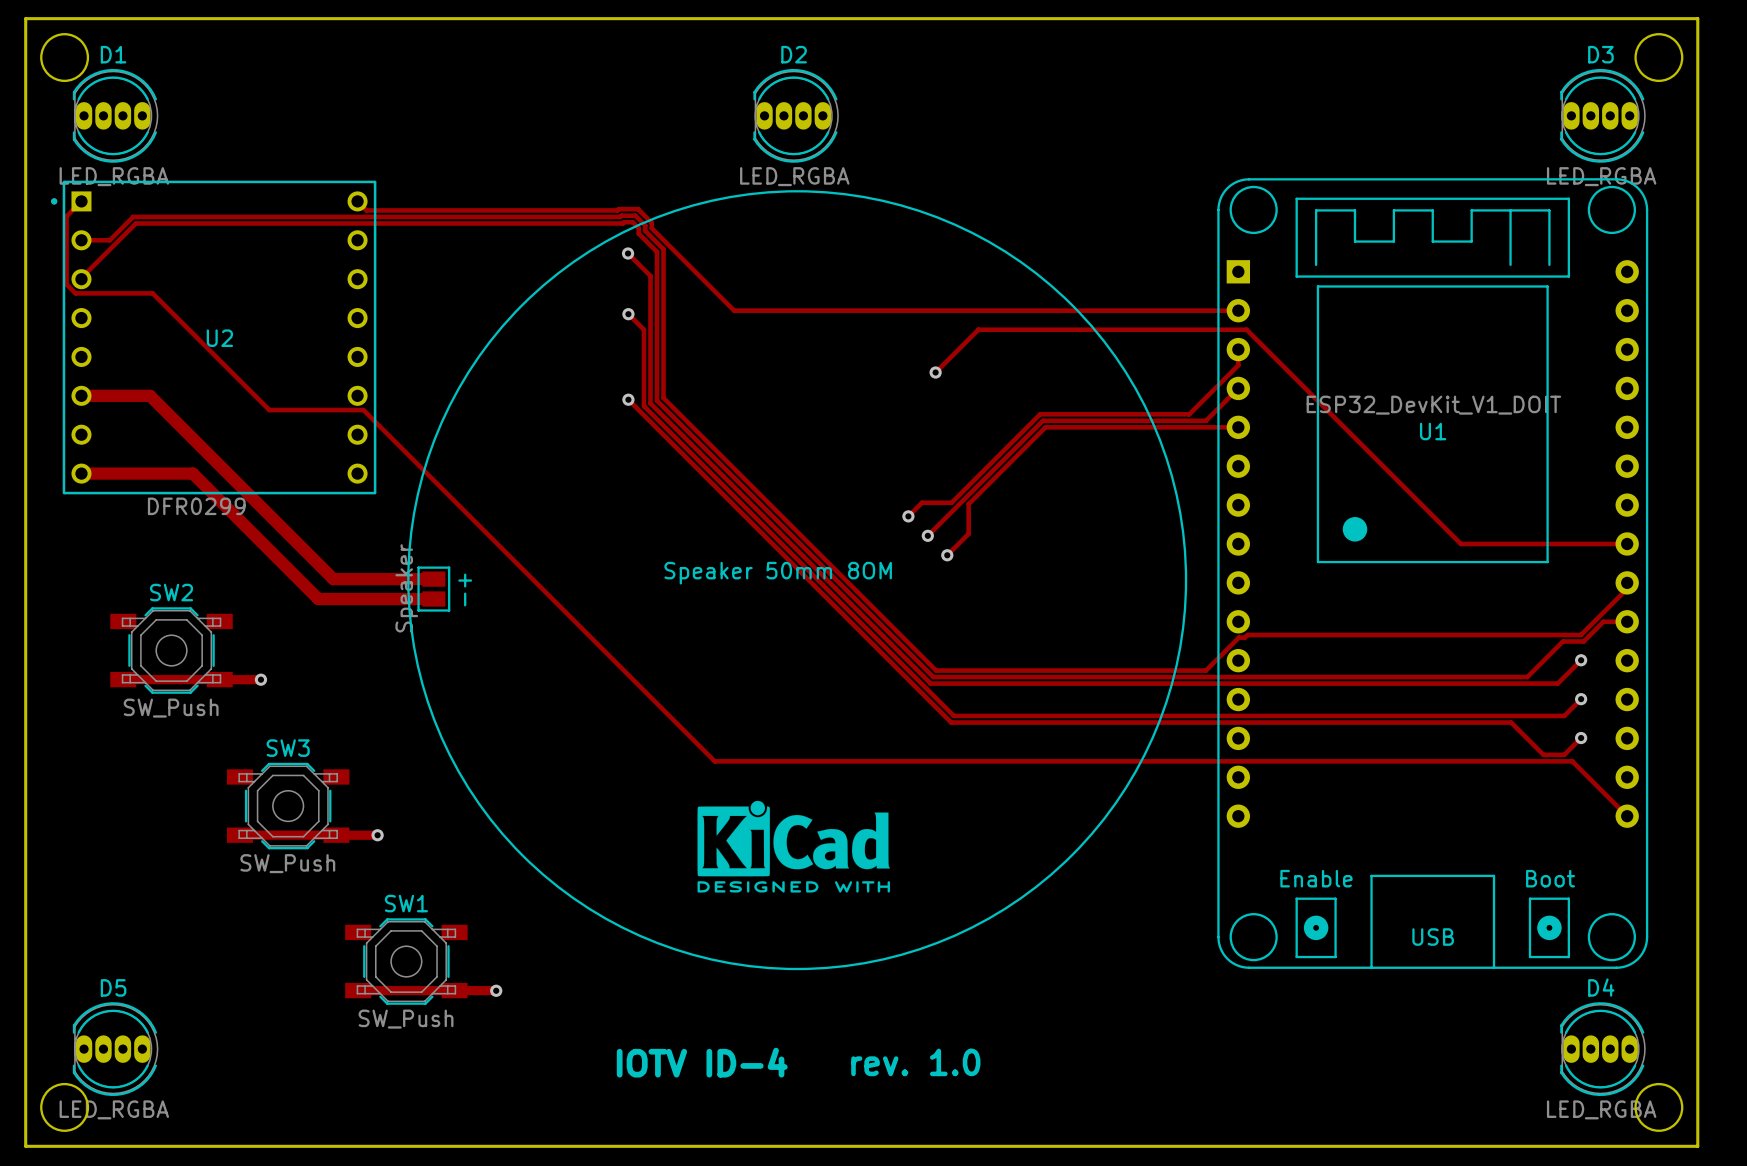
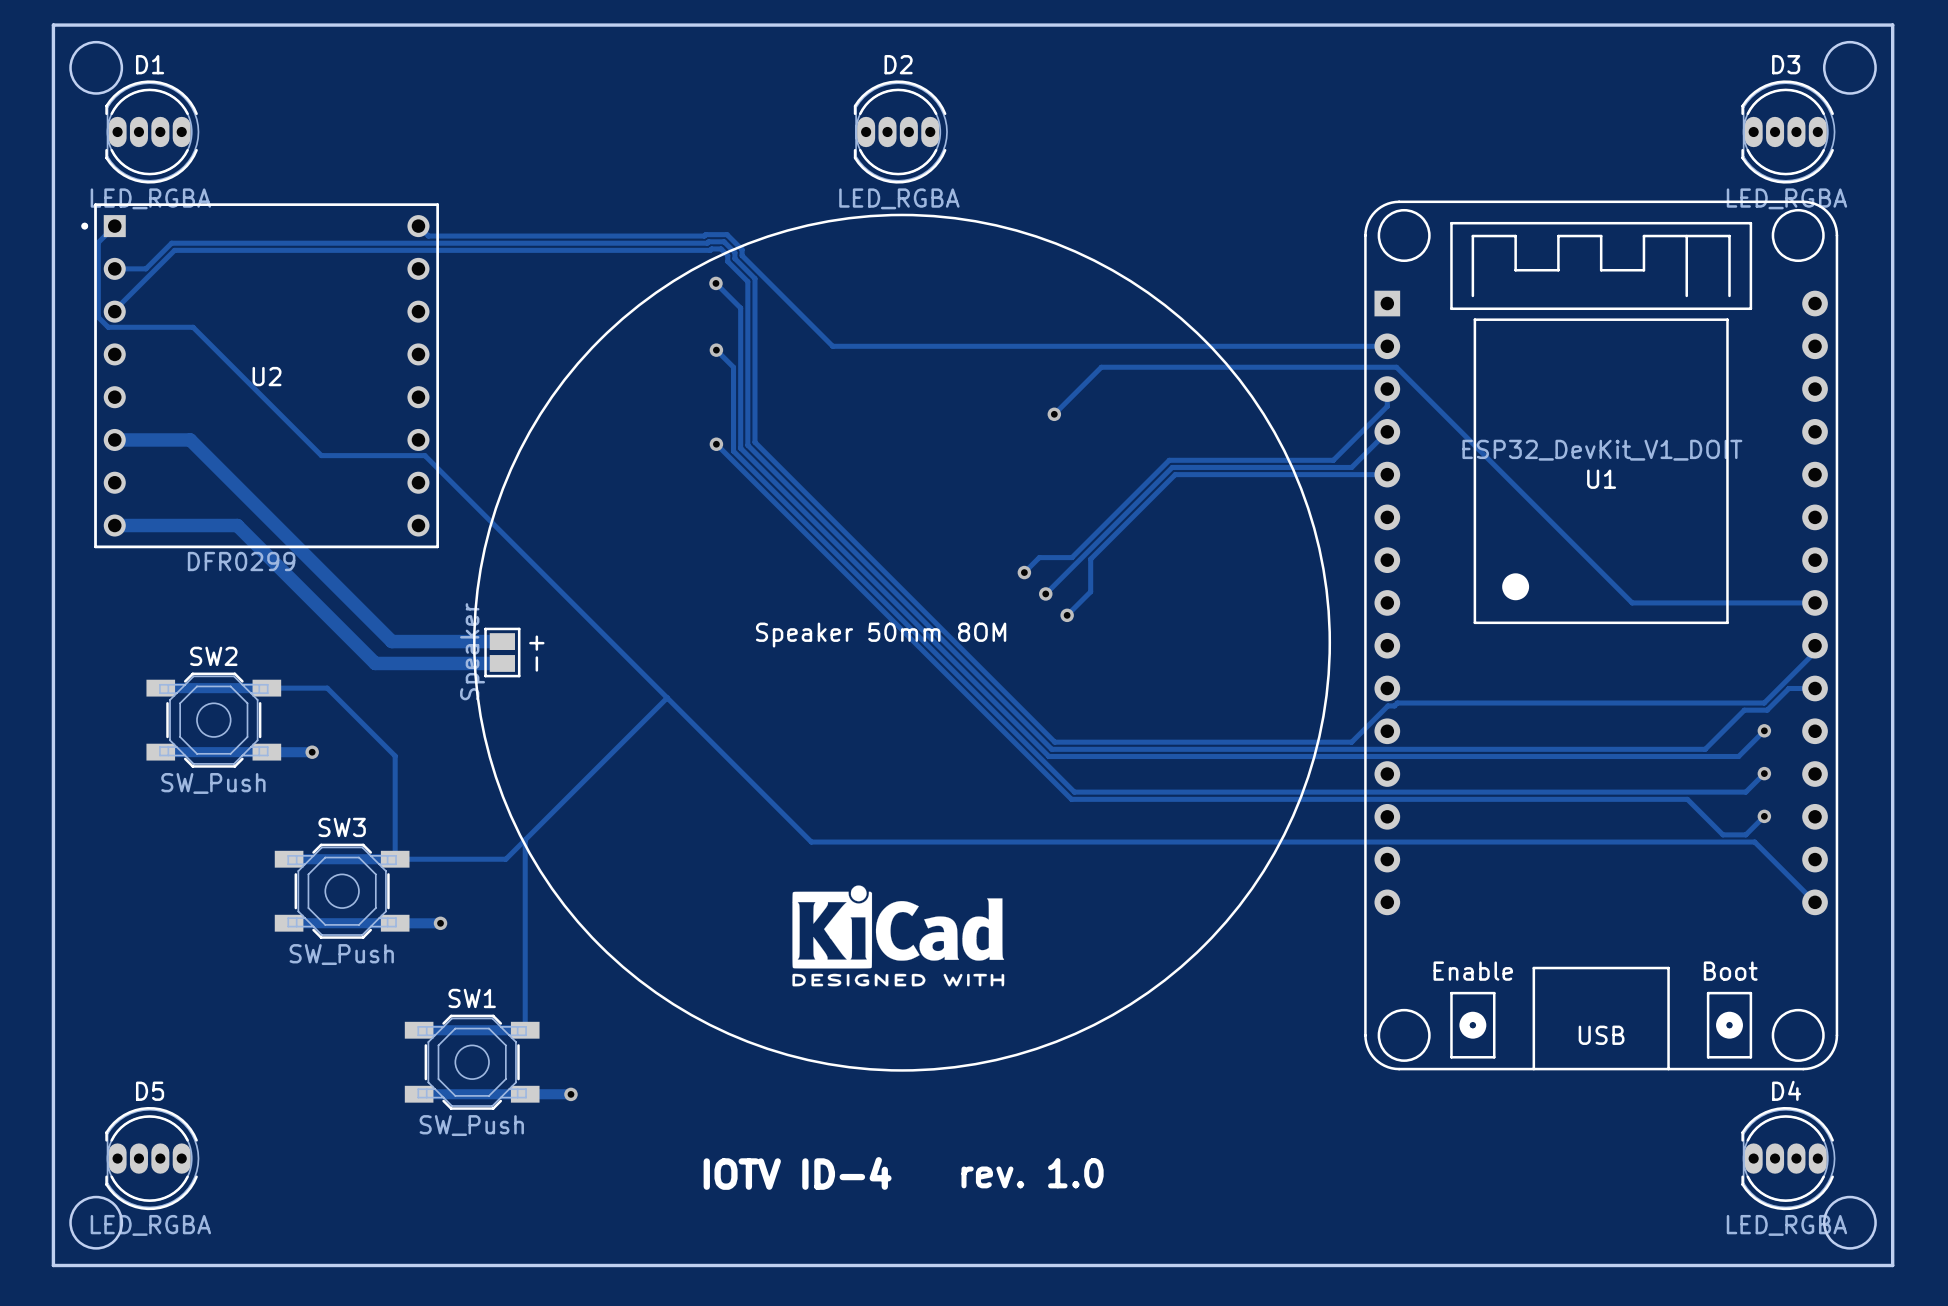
track: none -> (160, 688) (327, 688) (395, 756) (395, 859)
track: none -> (667, 697) (505, 859) (395, 859)
track: none -> (525, 839) (525, 1030) (419, 1030)
track: none -> (289, 859) (395, 859)

